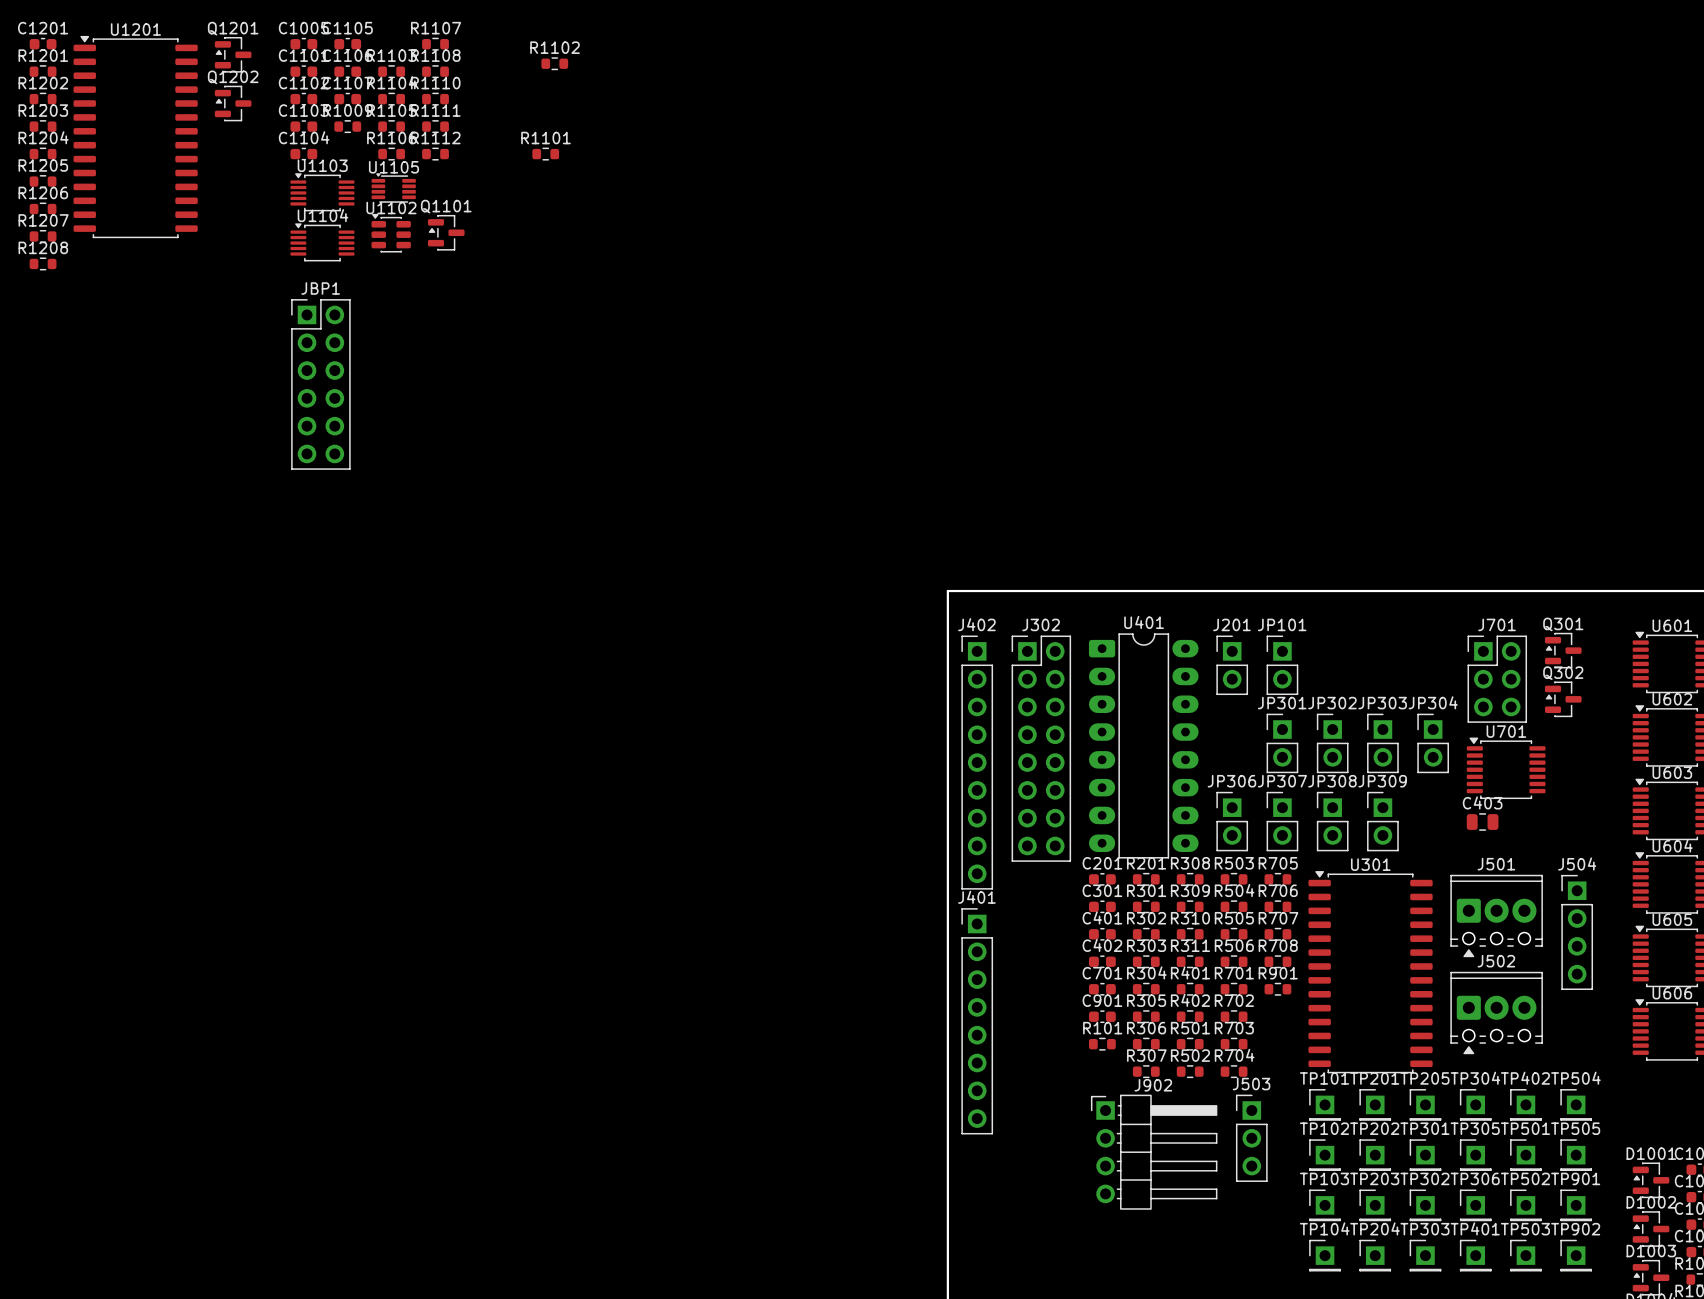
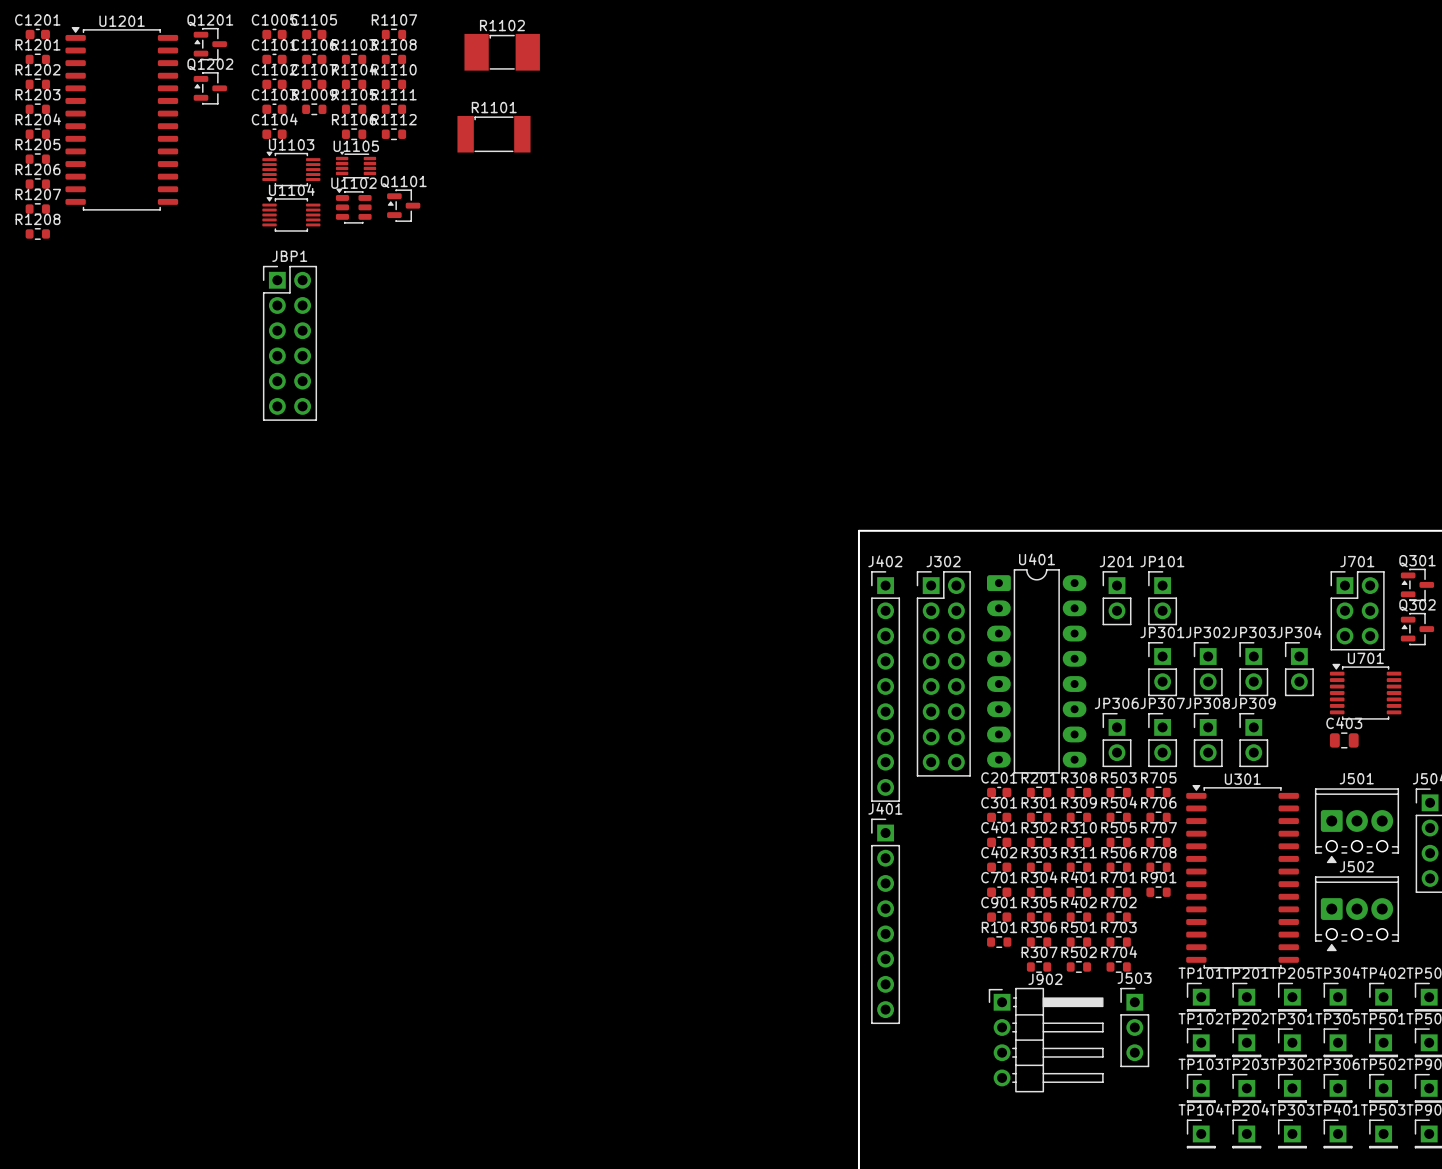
R1102 footprint: [541, 57, 569, 71] -> [464, 33, 540, 71]
R1101 footprint: [532, 147, 560, 161] -> [457, 115, 531, 153]

